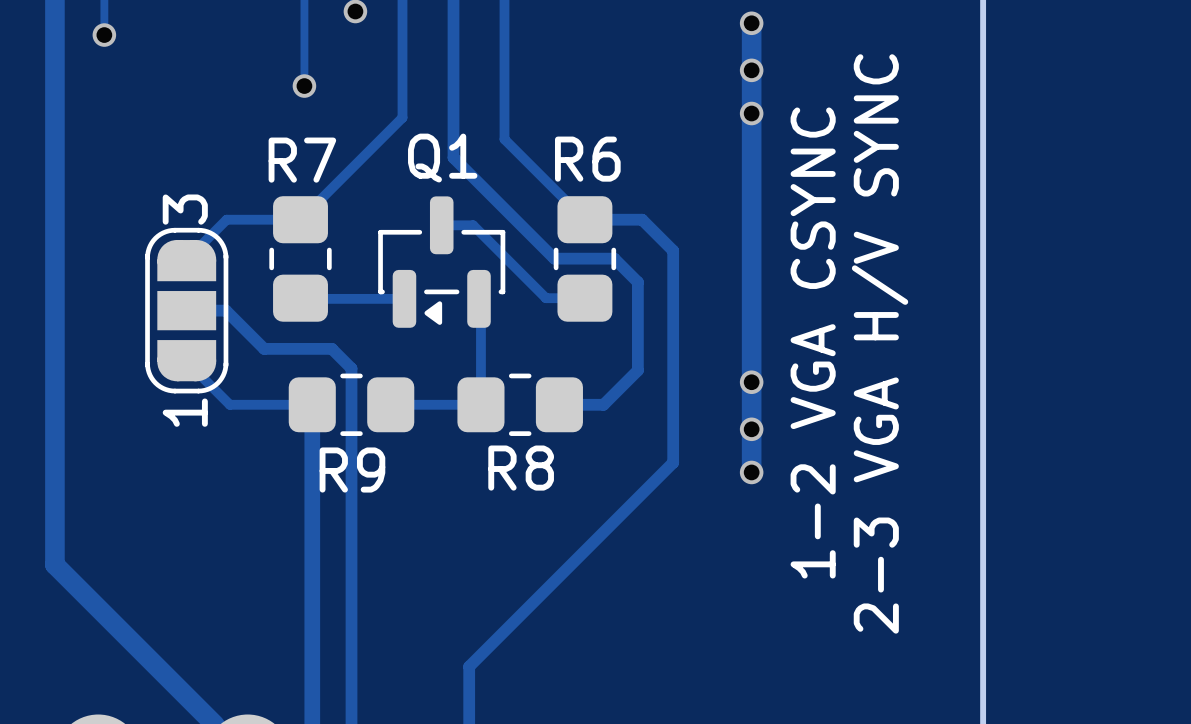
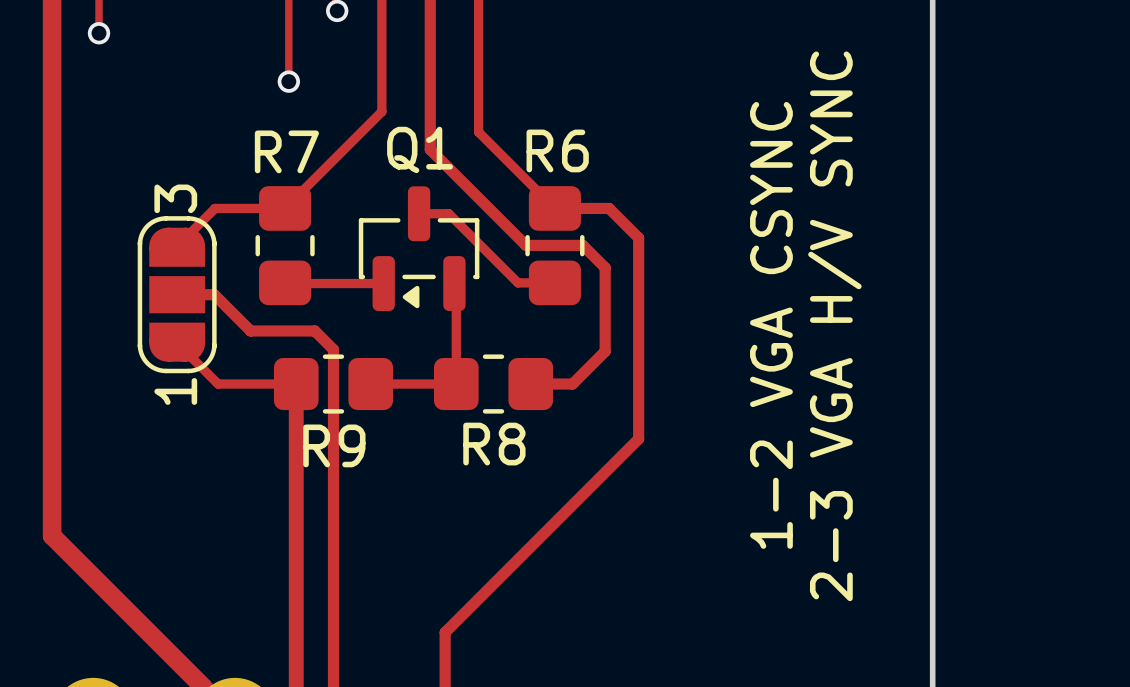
track: (751, 23) (751, 472) -> none
via: (751, 23) -> none
via: (751, 70) -> none
via: (751, 113) -> none
via: (751, 382) -> none
via: (751, 429) -> none
via: (751, 472) -> none

